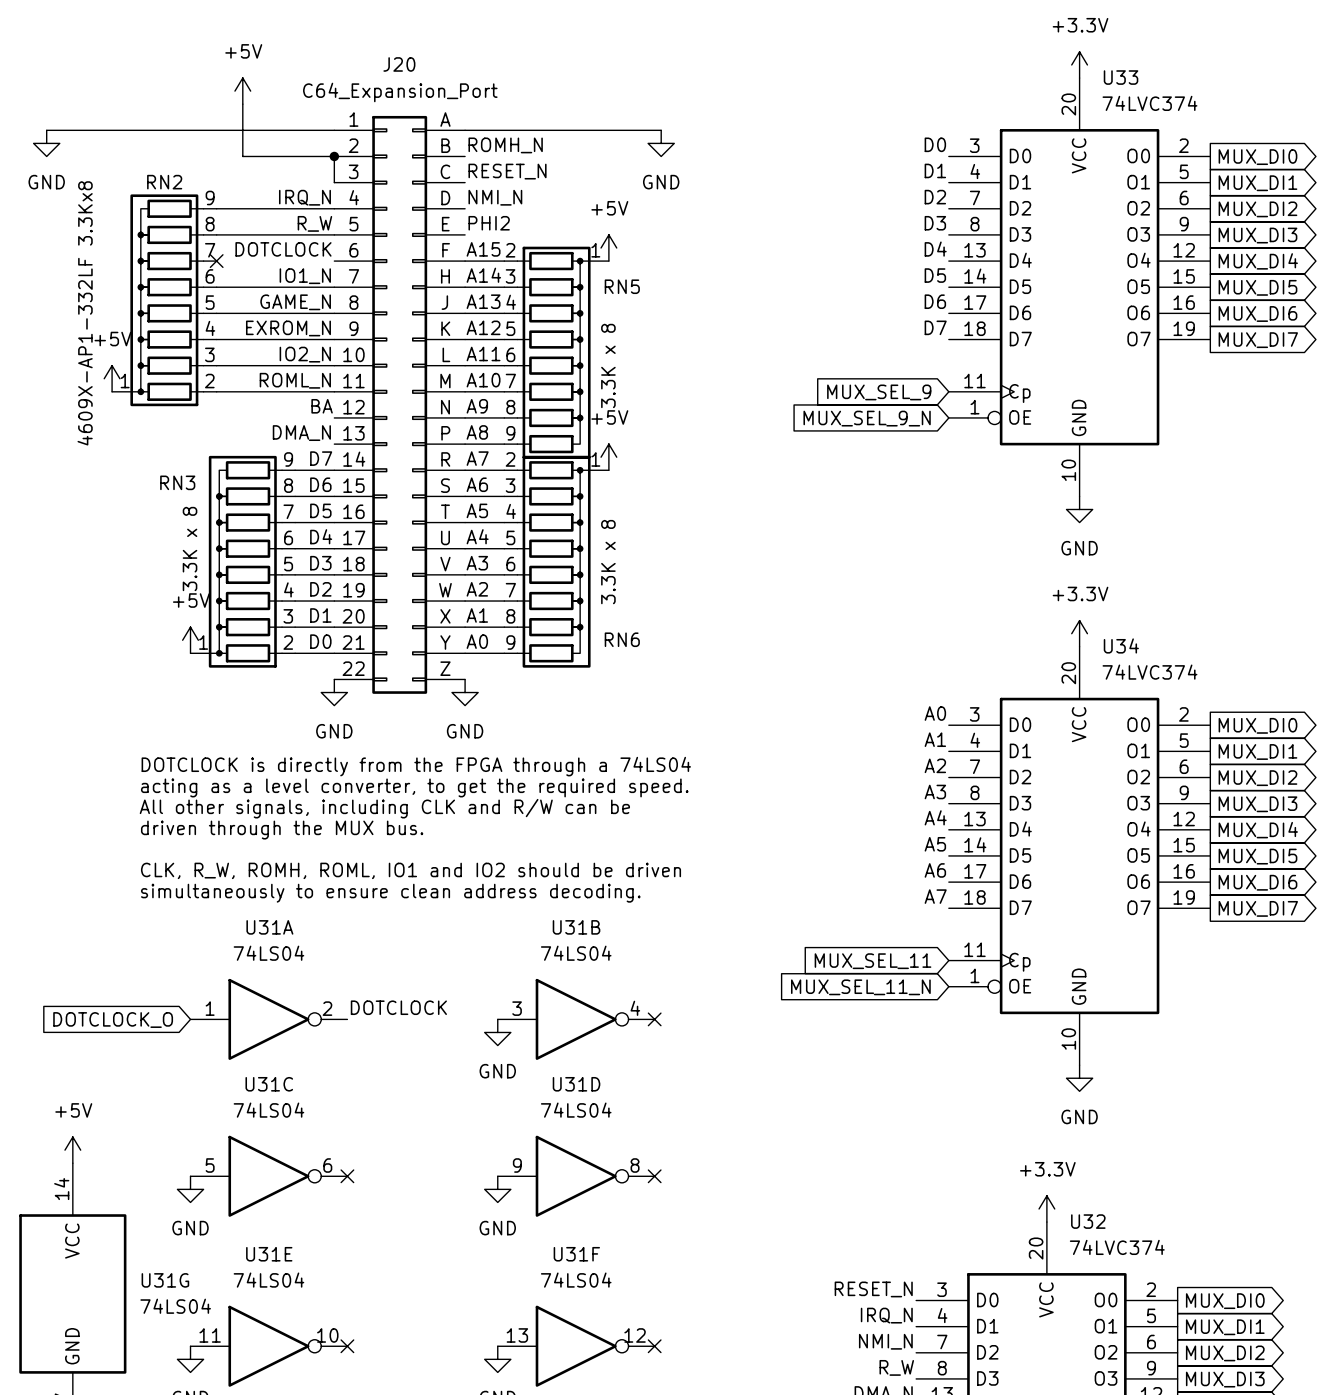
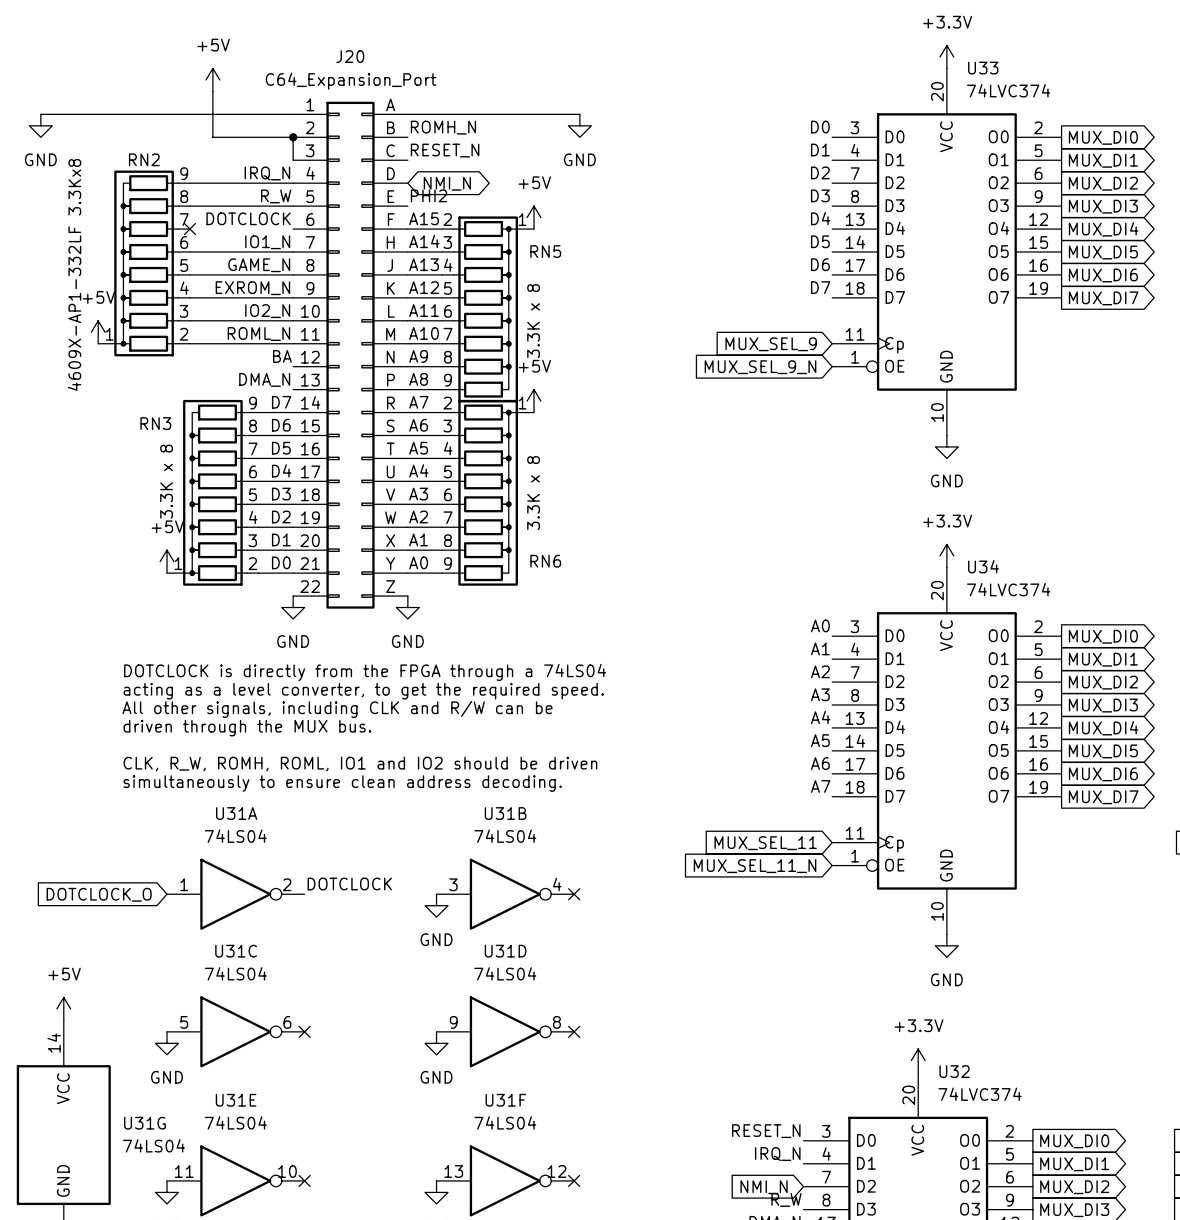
label: NMI_N (495, 197) -> none
global label: none -> NMI_N (447, 183)
label: NMI_N (885, 1341) -> none
global label: none -> NMI_N (764, 1187)

